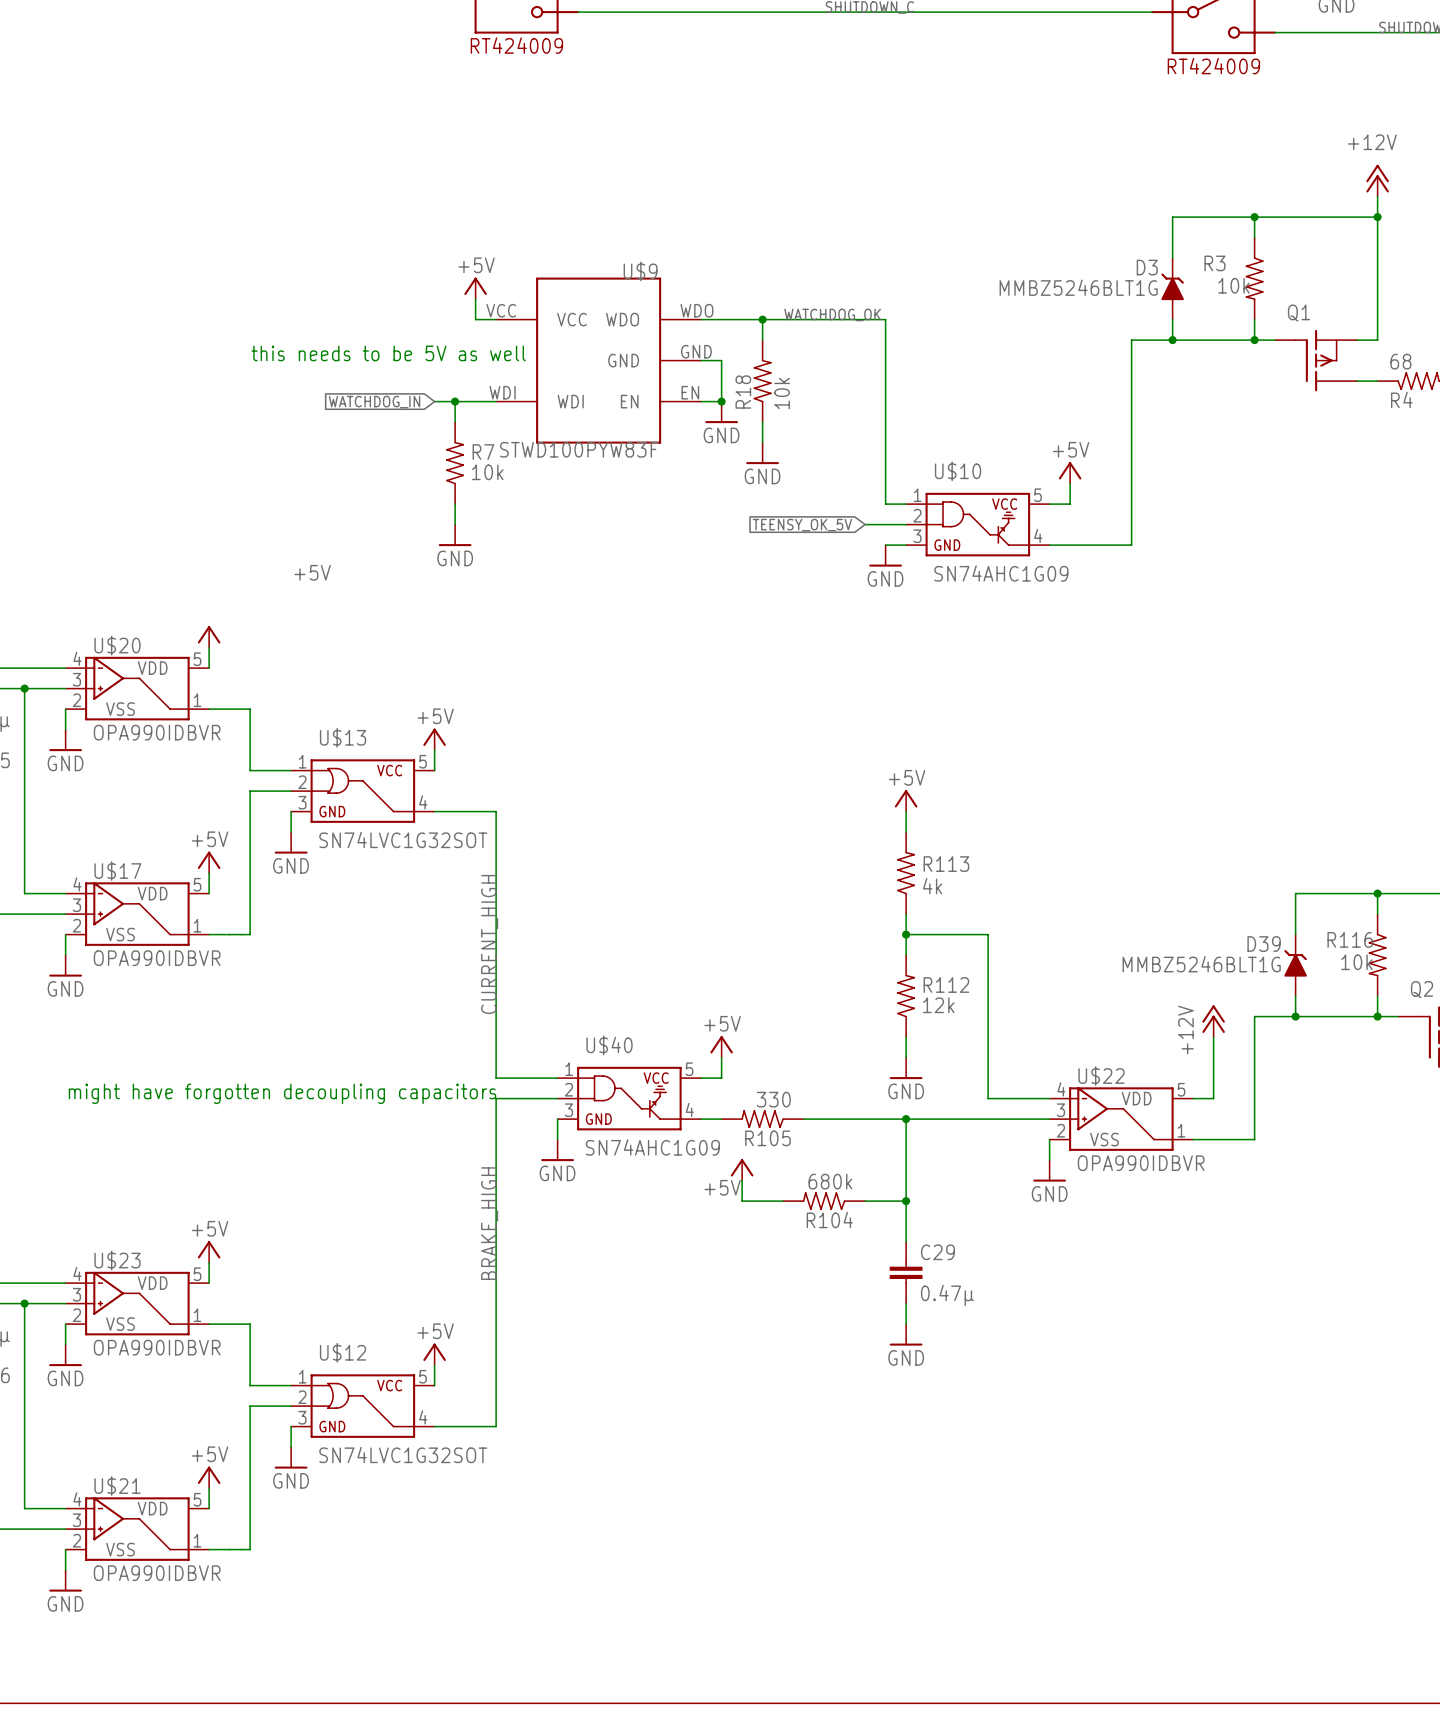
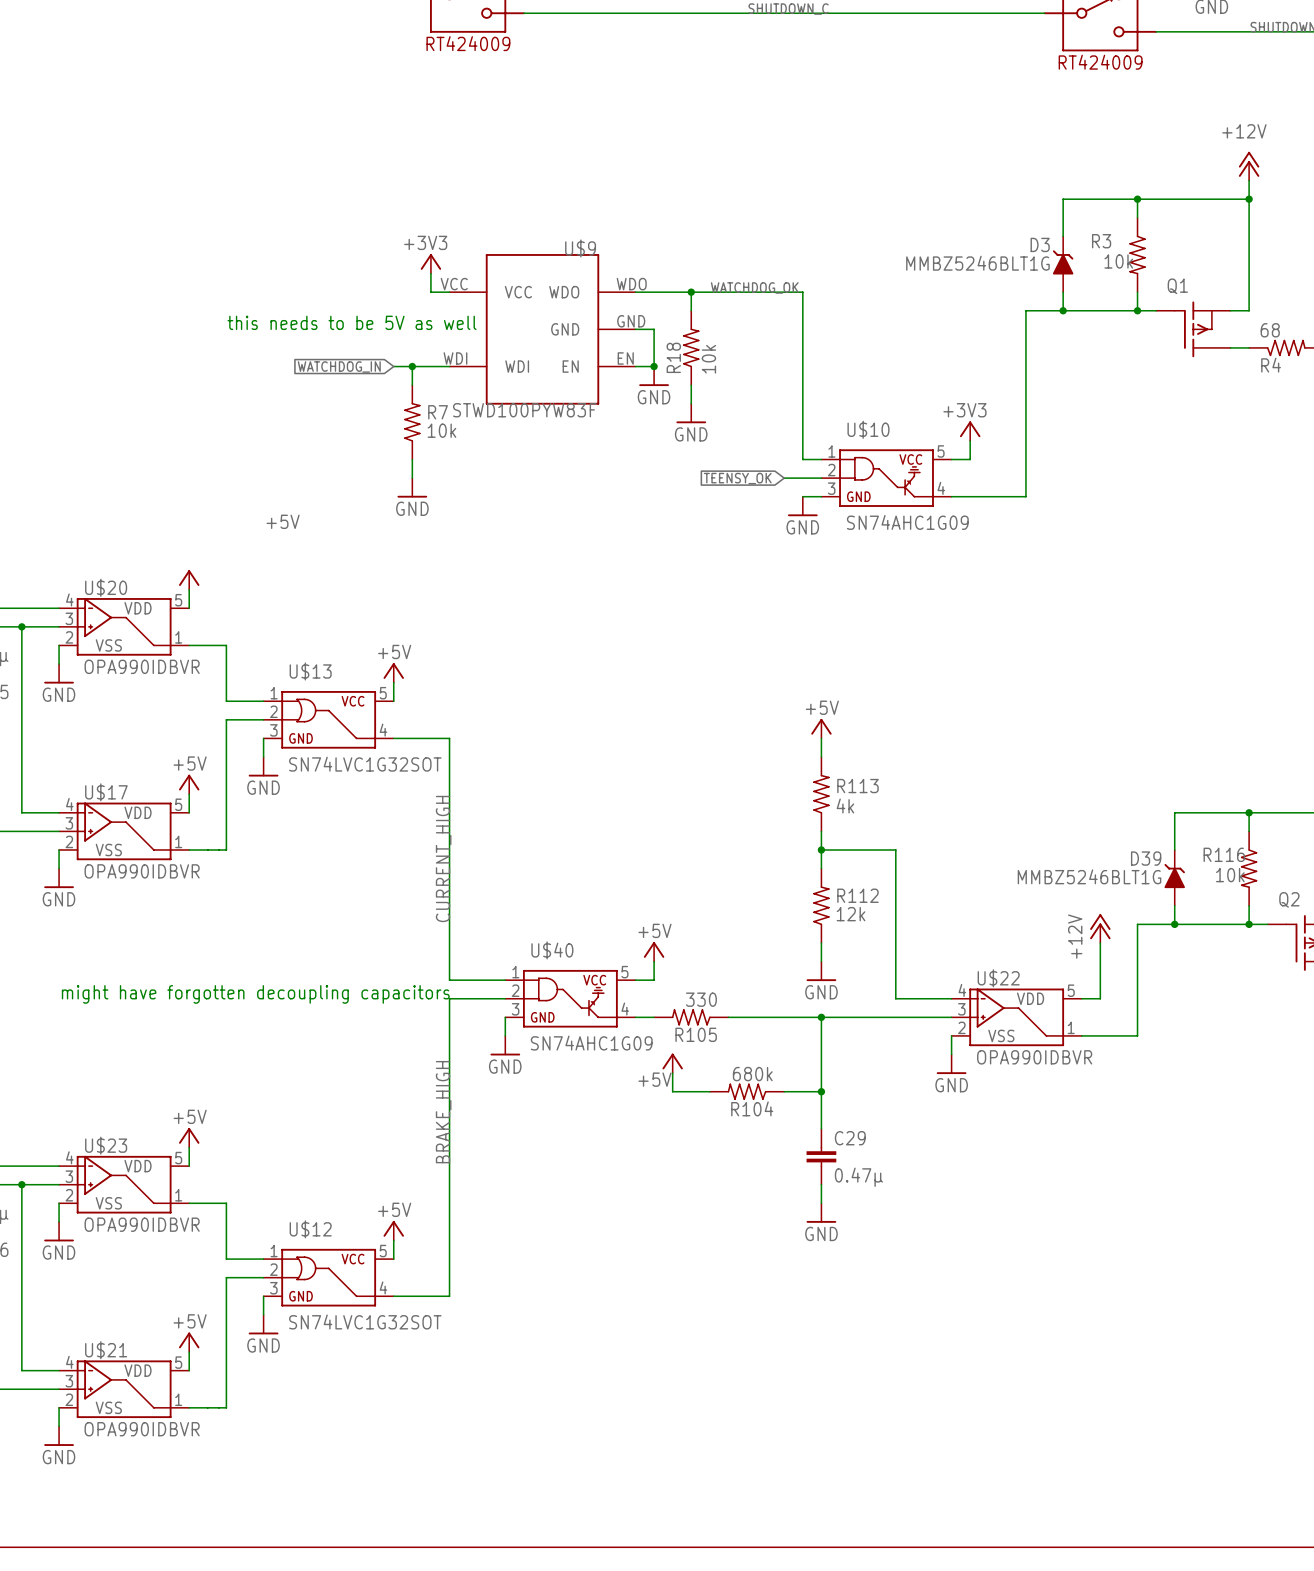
power symbol: +5V (475, 288) -> +3V3 (430, 263)
power symbol: +5V (1070, 472) -> +3V3 (970, 431)
global label: TEENSY_OK_5V (802, 525) -> TEENSY_OK (737, 478)

